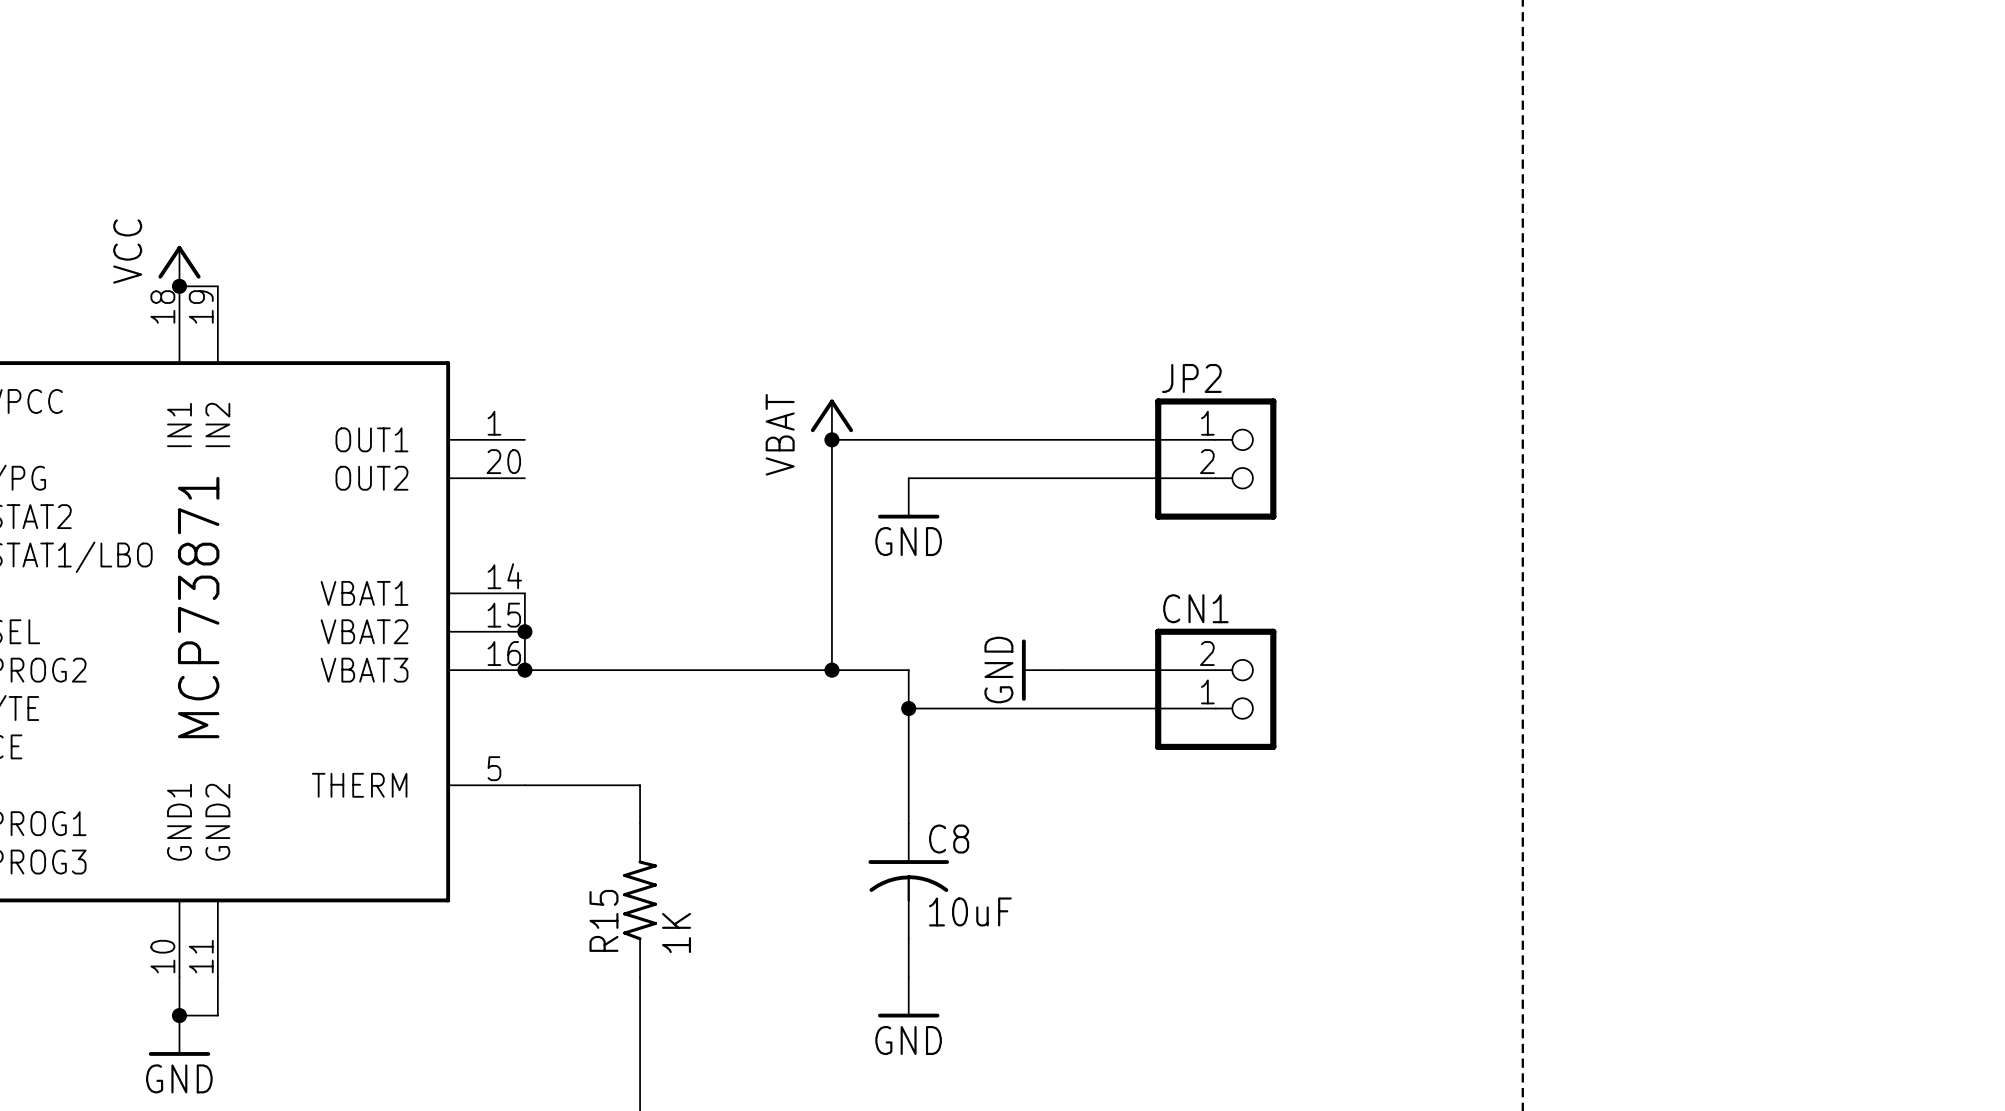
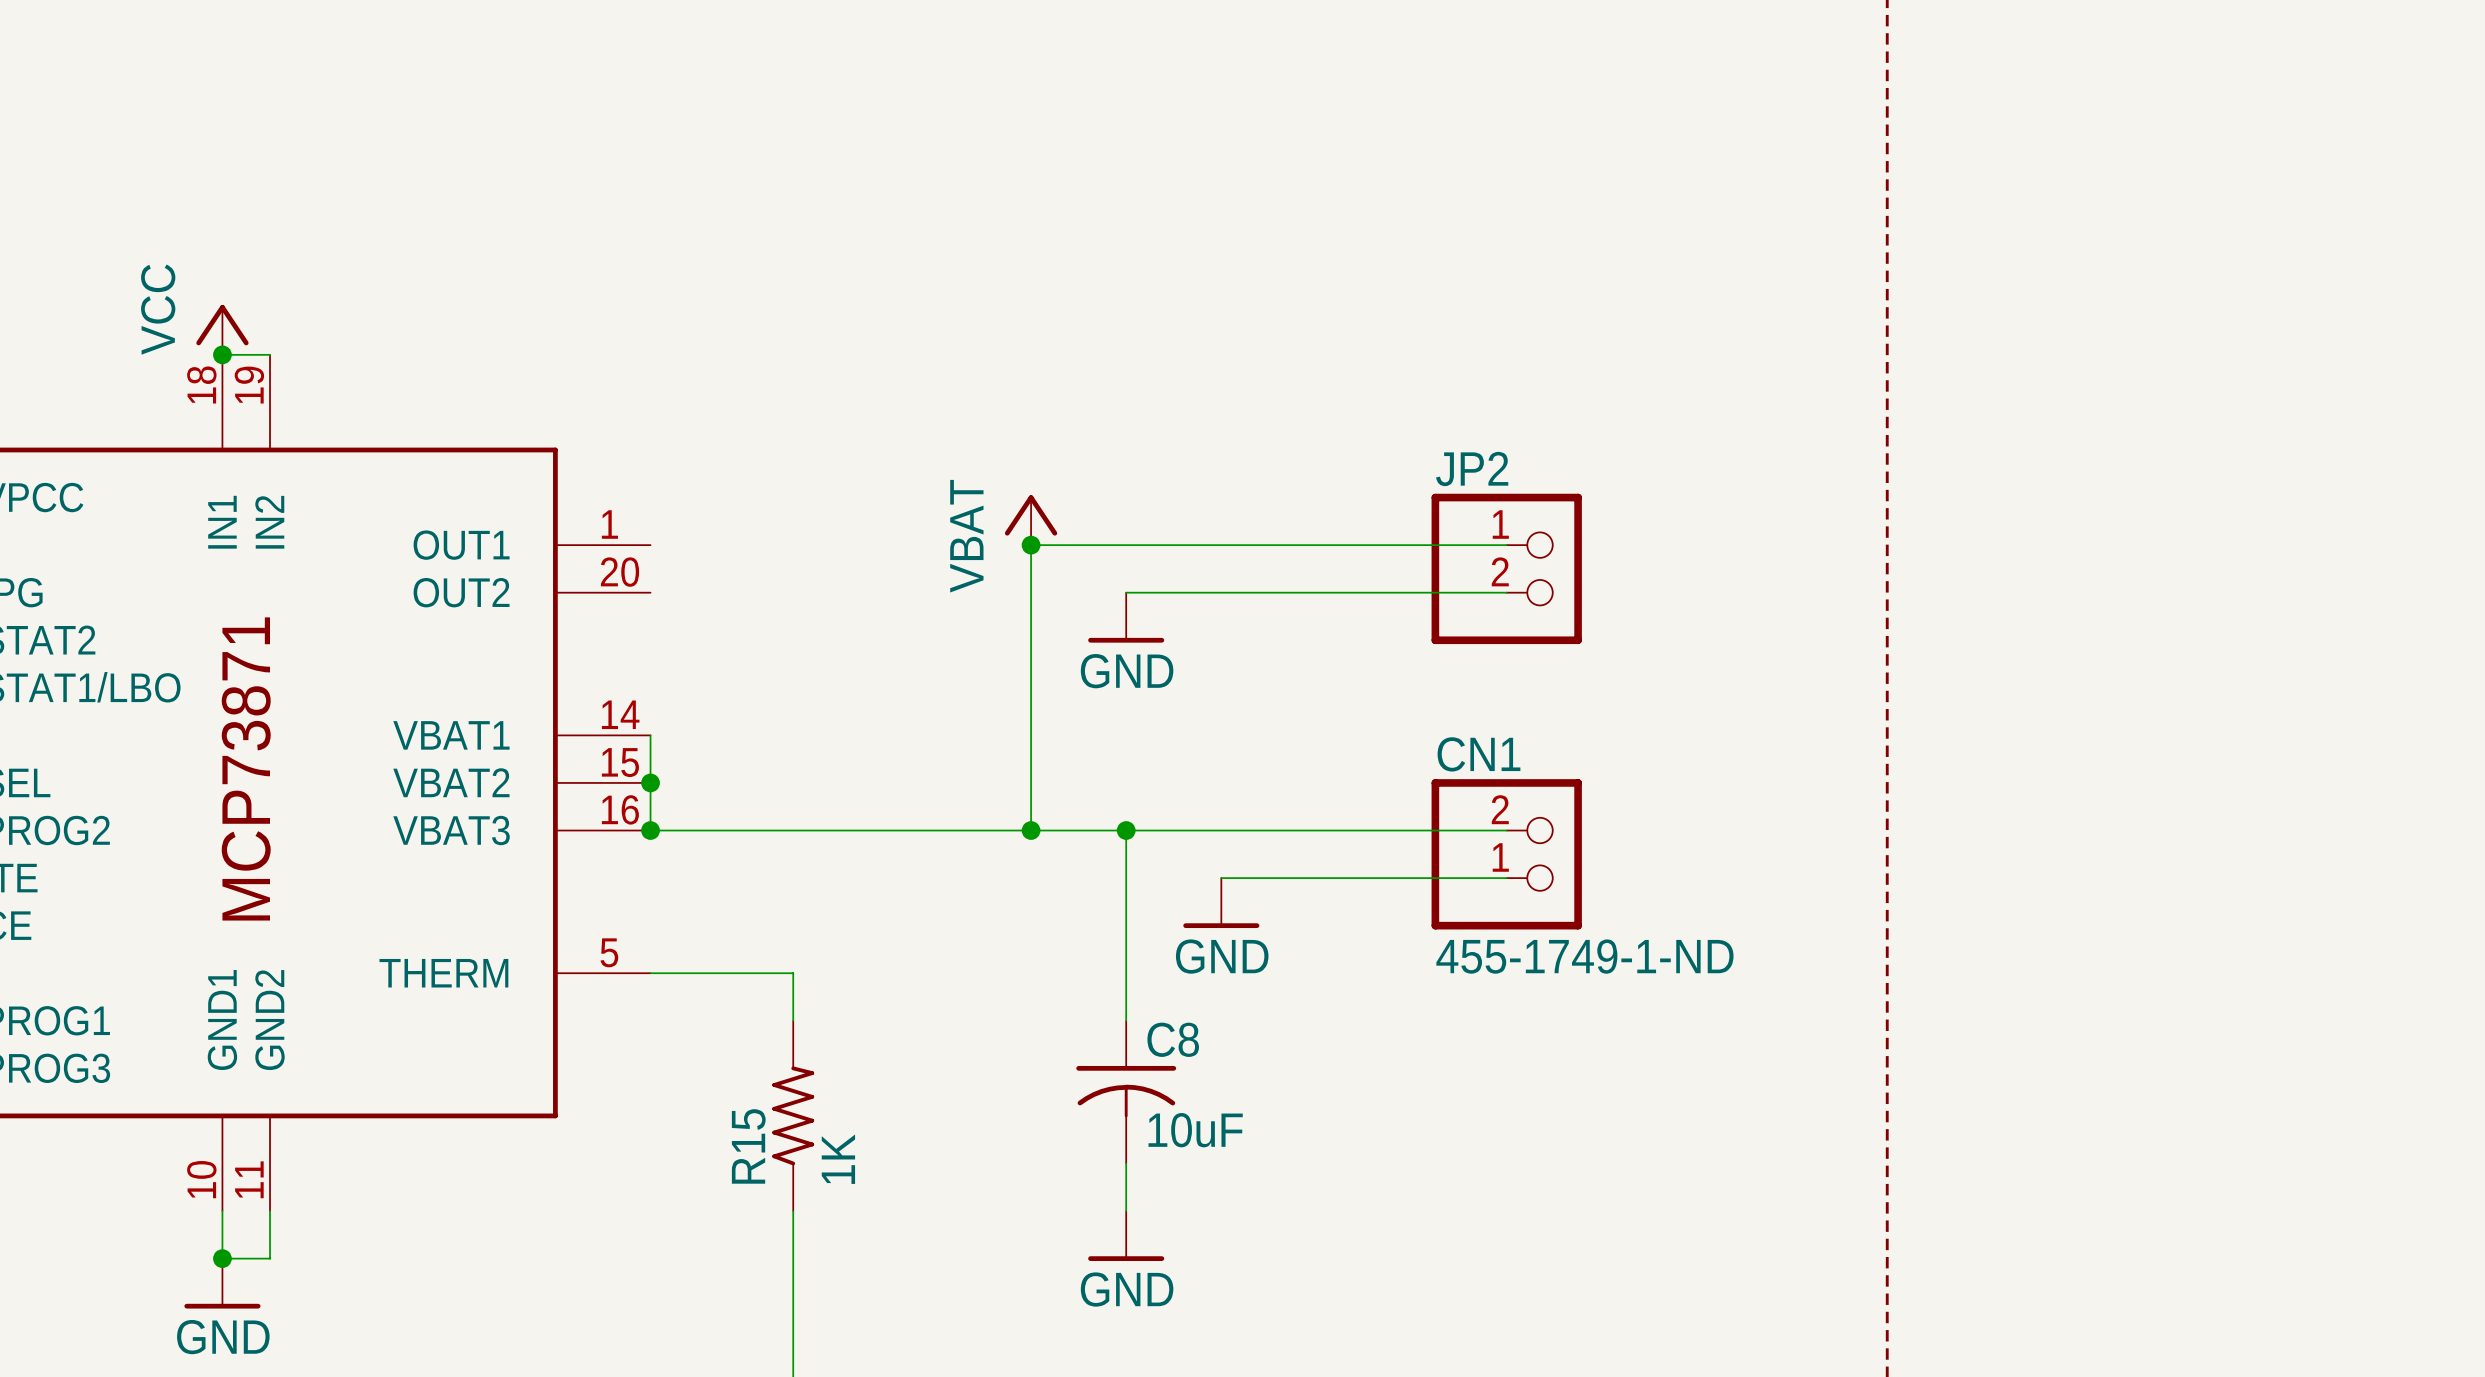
wire: none -> (1126, 830) (1316, 830)
power symbol rotation: 0° (1023, 670) -> 90° counterclockwise (1221, 925)
power symbol position: GND (1042, 670) -> GND (1221, 903)
wire: (908, 708) (985, 708) -> none
junction position: (908, 708) -> (1126, 830)
CN1 value: none -> 455-1749-1-ND (1584, 956)

